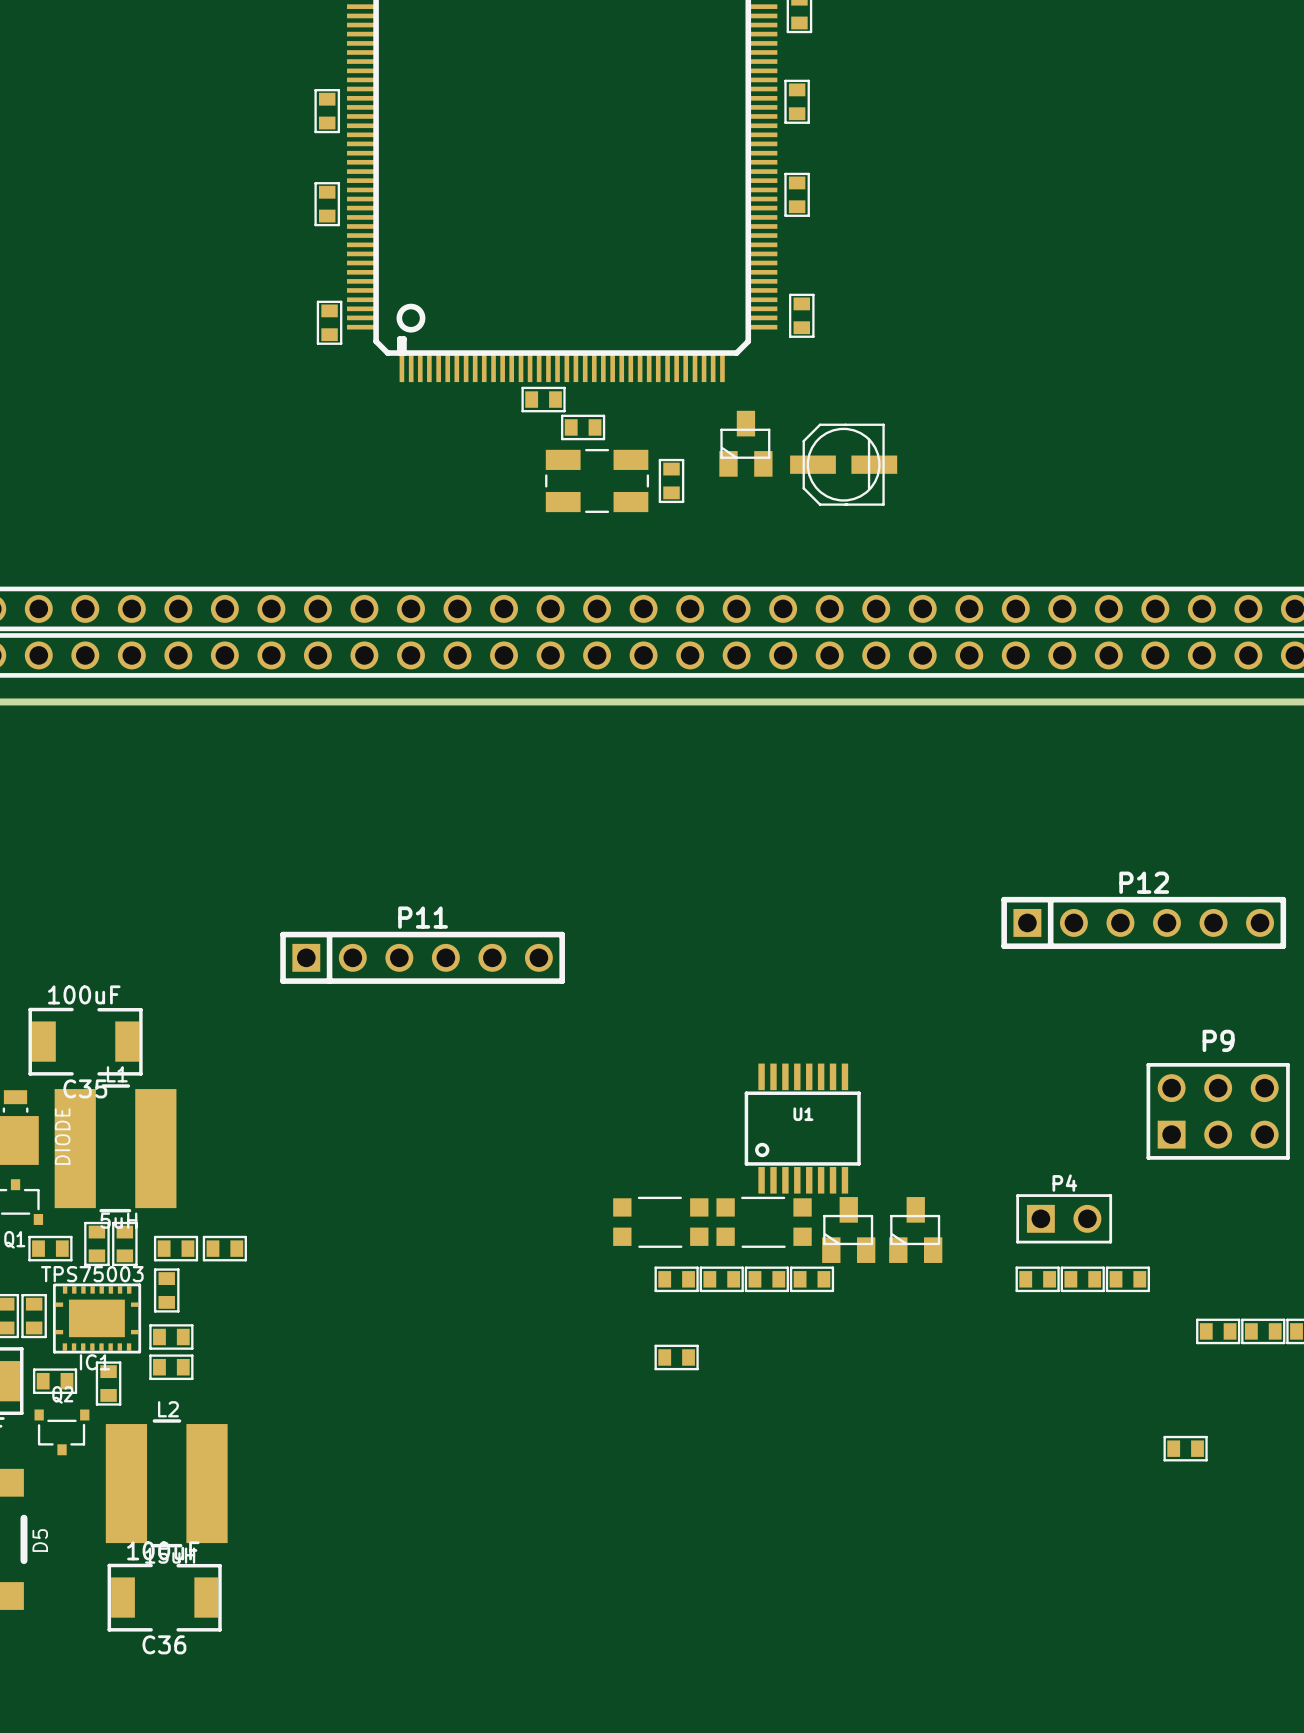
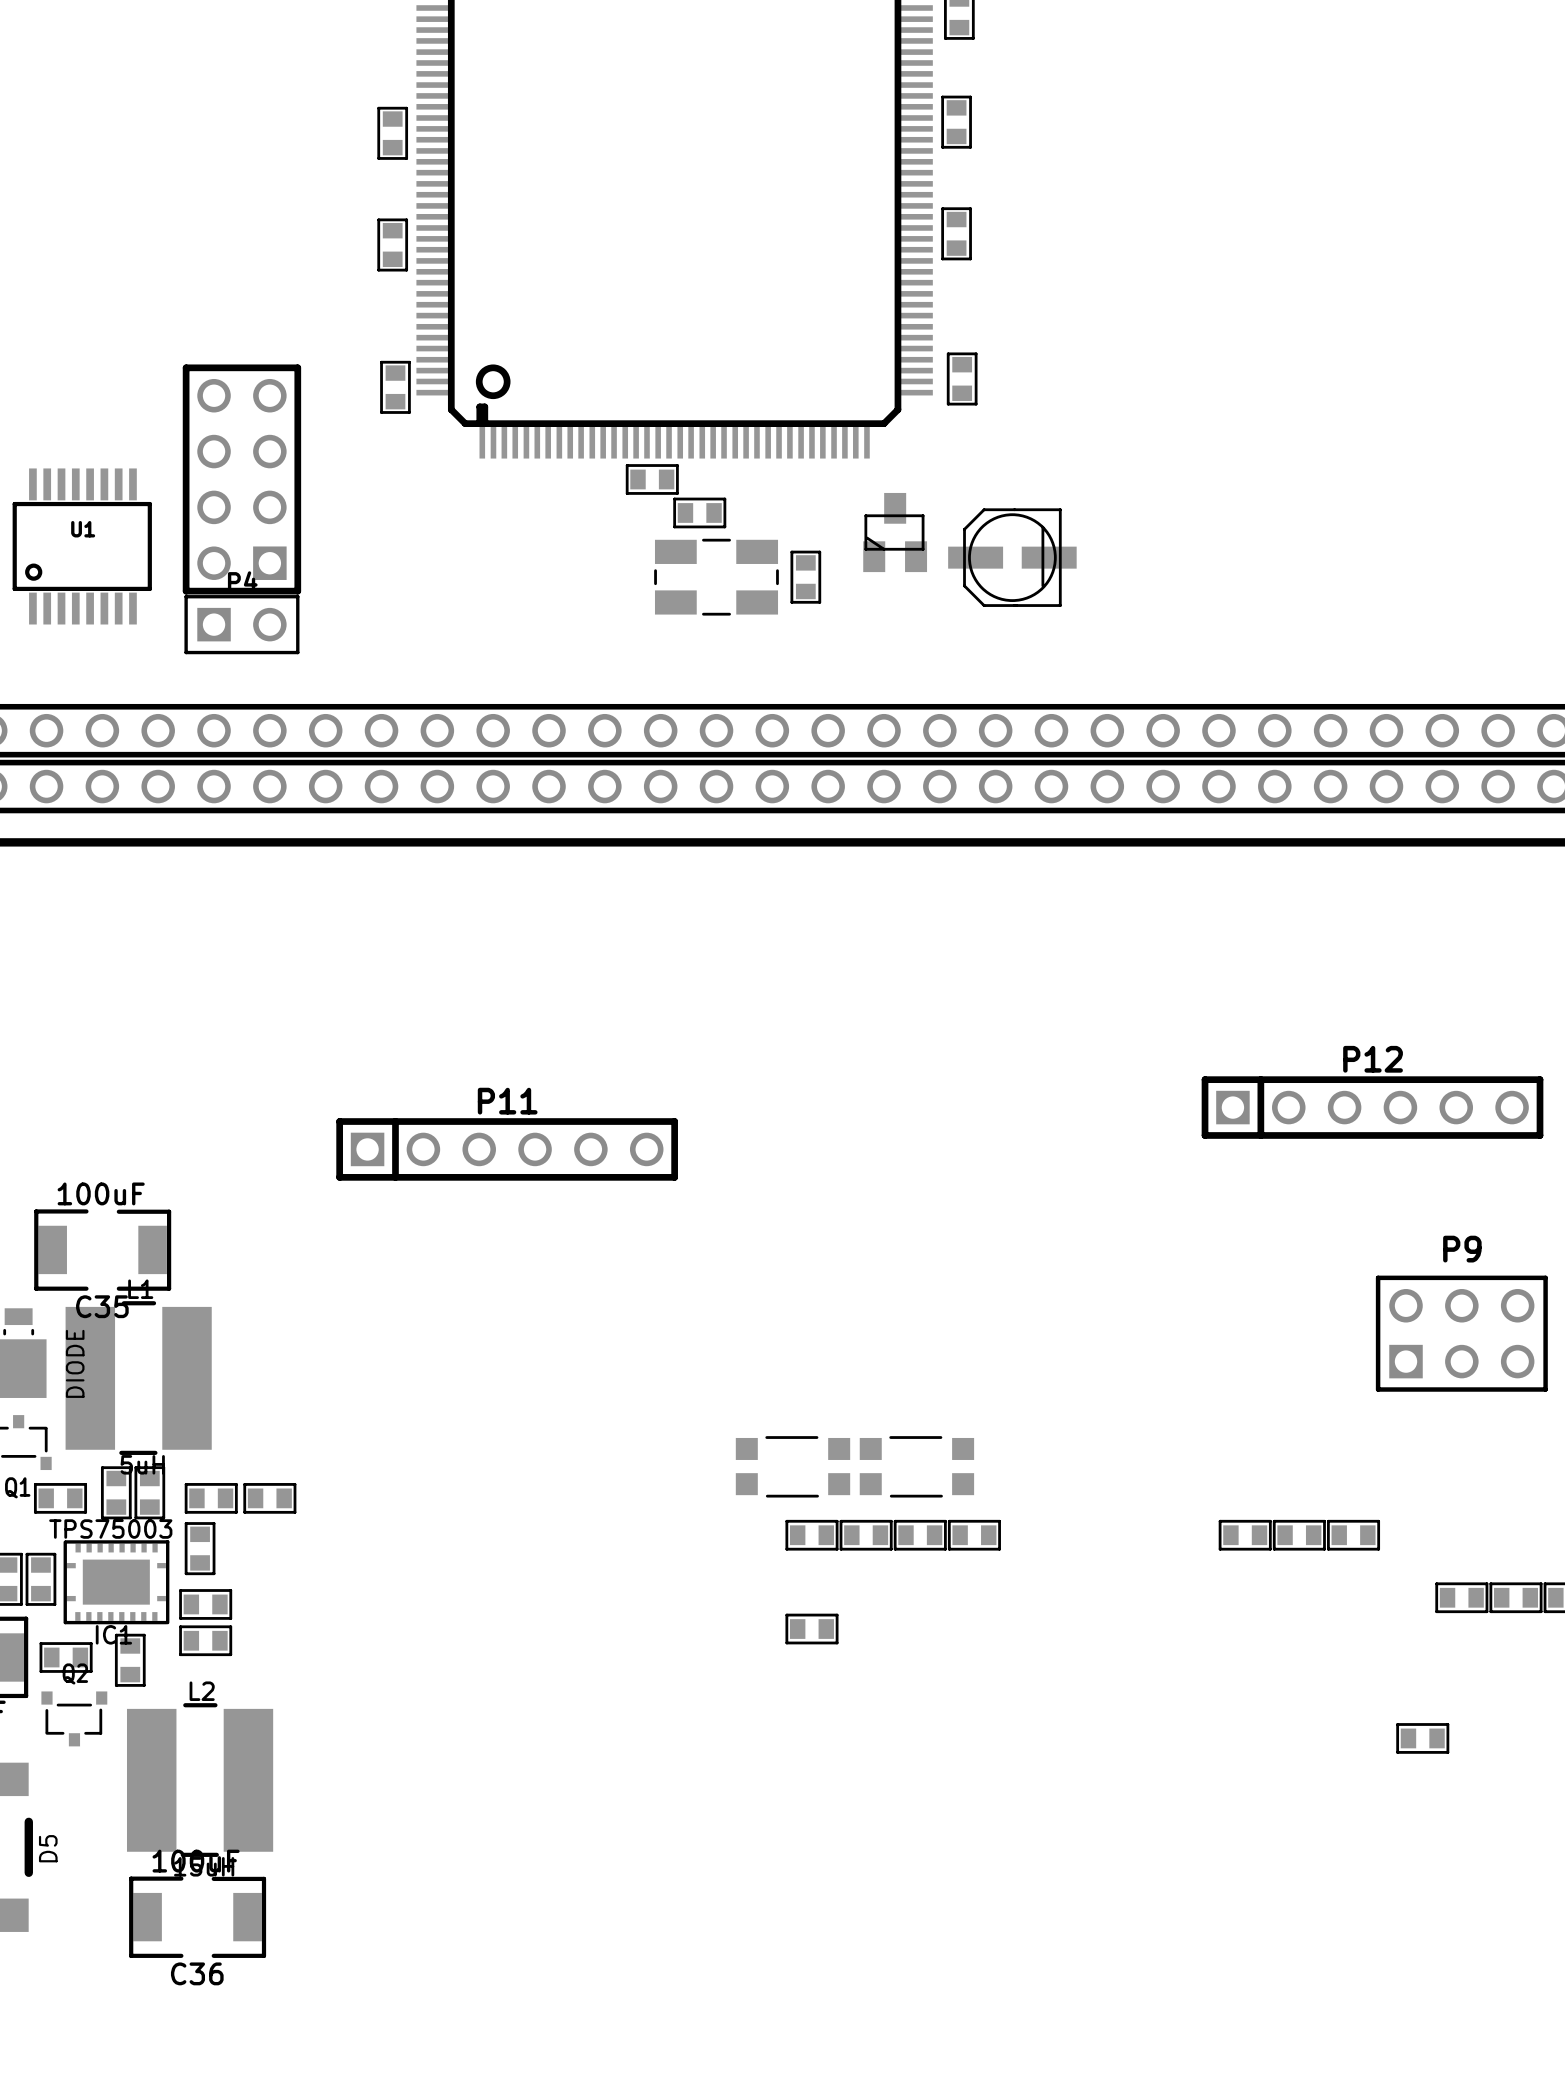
part: none -> (241, 479)
U1 position: (802, 1128) -> (82, 546)
P4 position: (1064, 1218) -> (241, 624)
part: (848, 1230) -> none
part: (915, 1230) -> none

